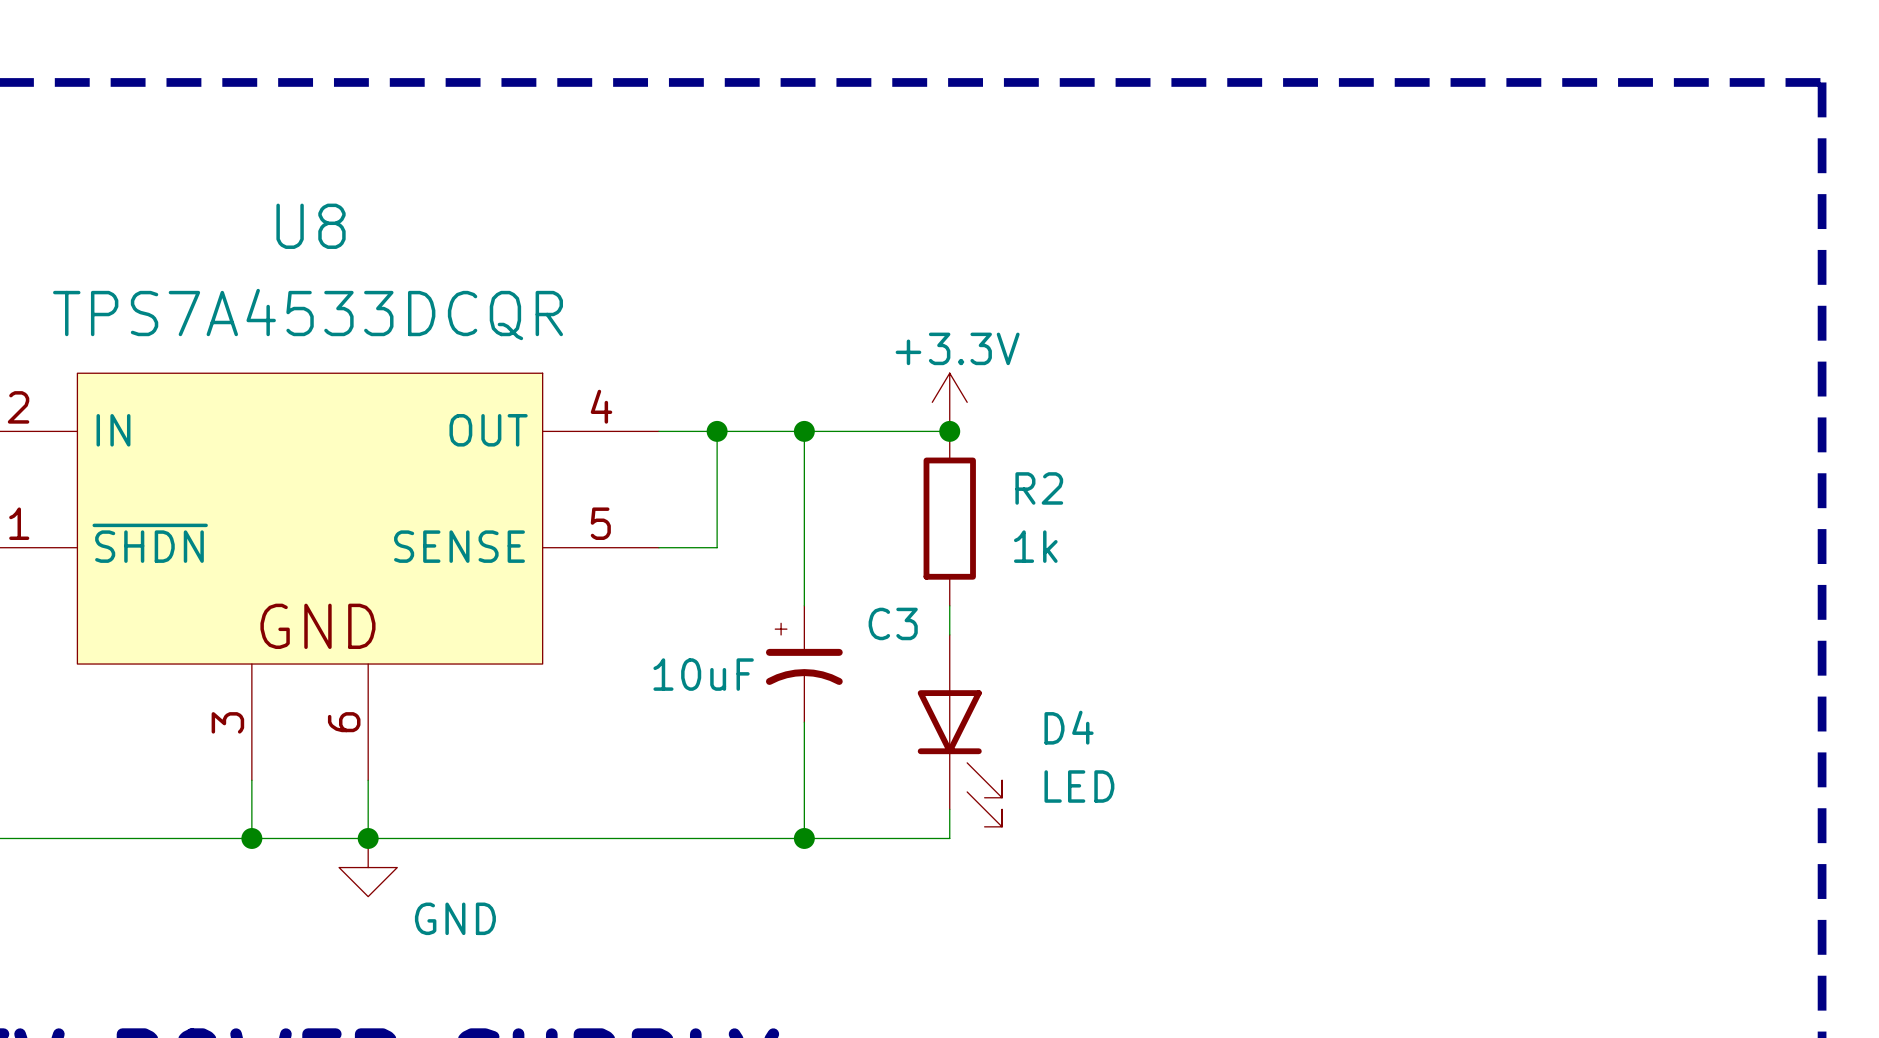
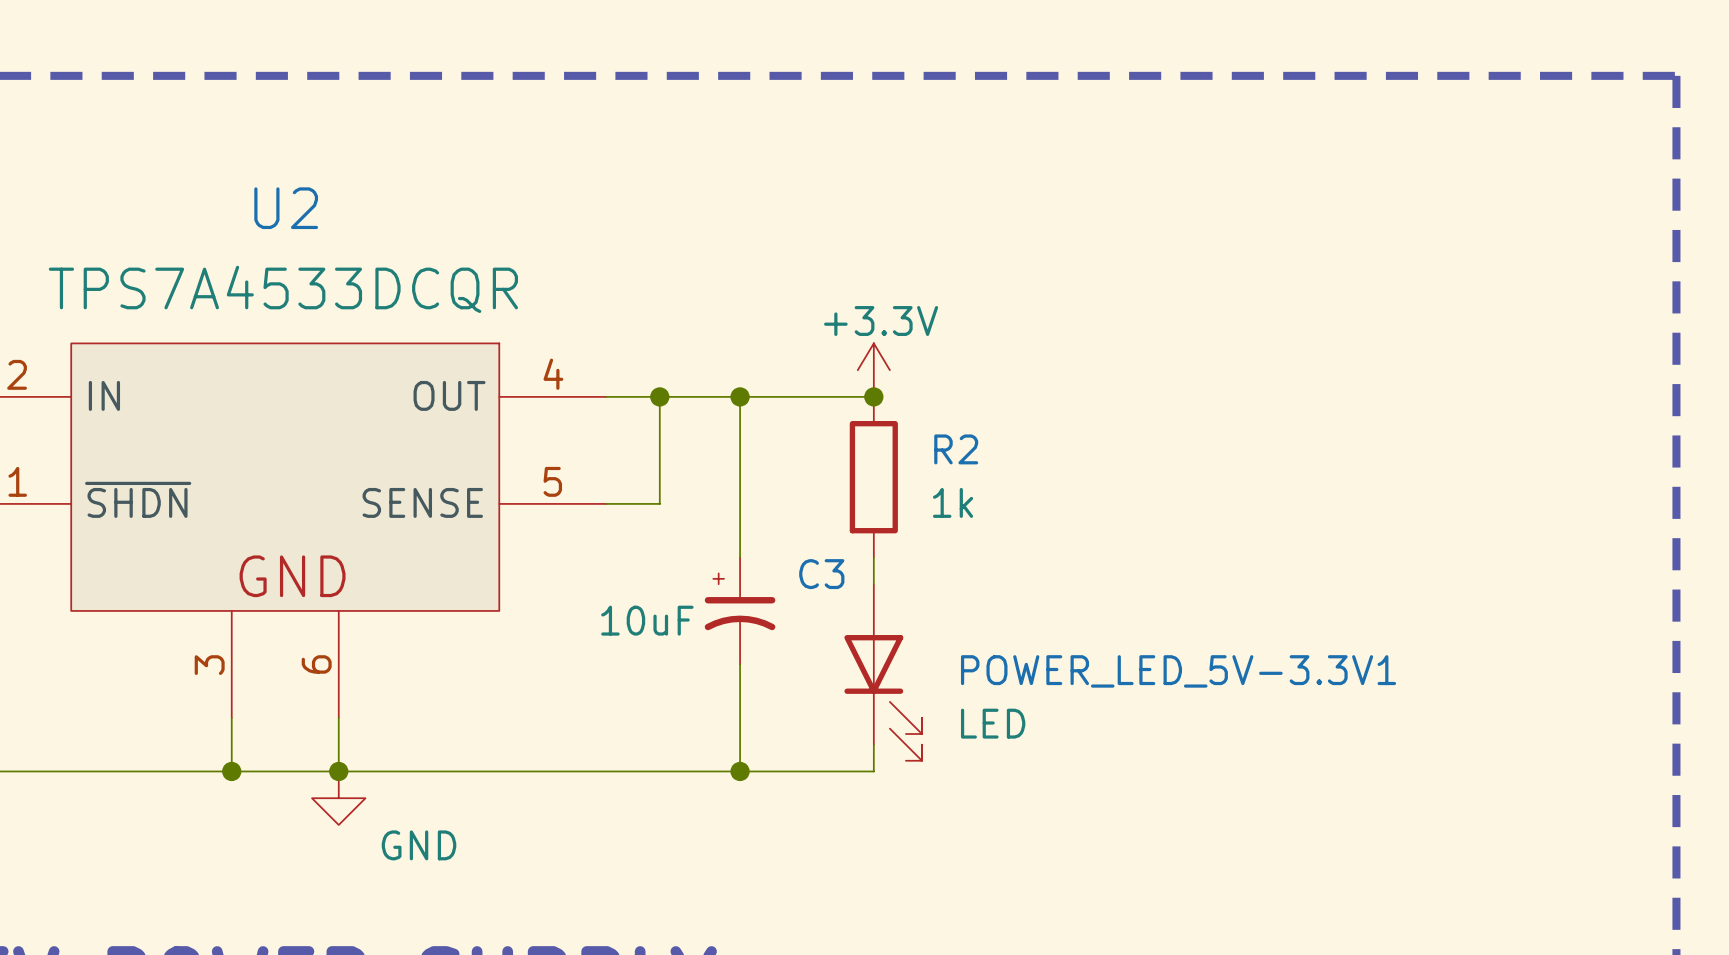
U8 name: U8 (311, 226) -> U2 (286, 208)
D4 name: D4 (1069, 727) -> POWER_LED_5V-3.3V1 (1178, 671)

